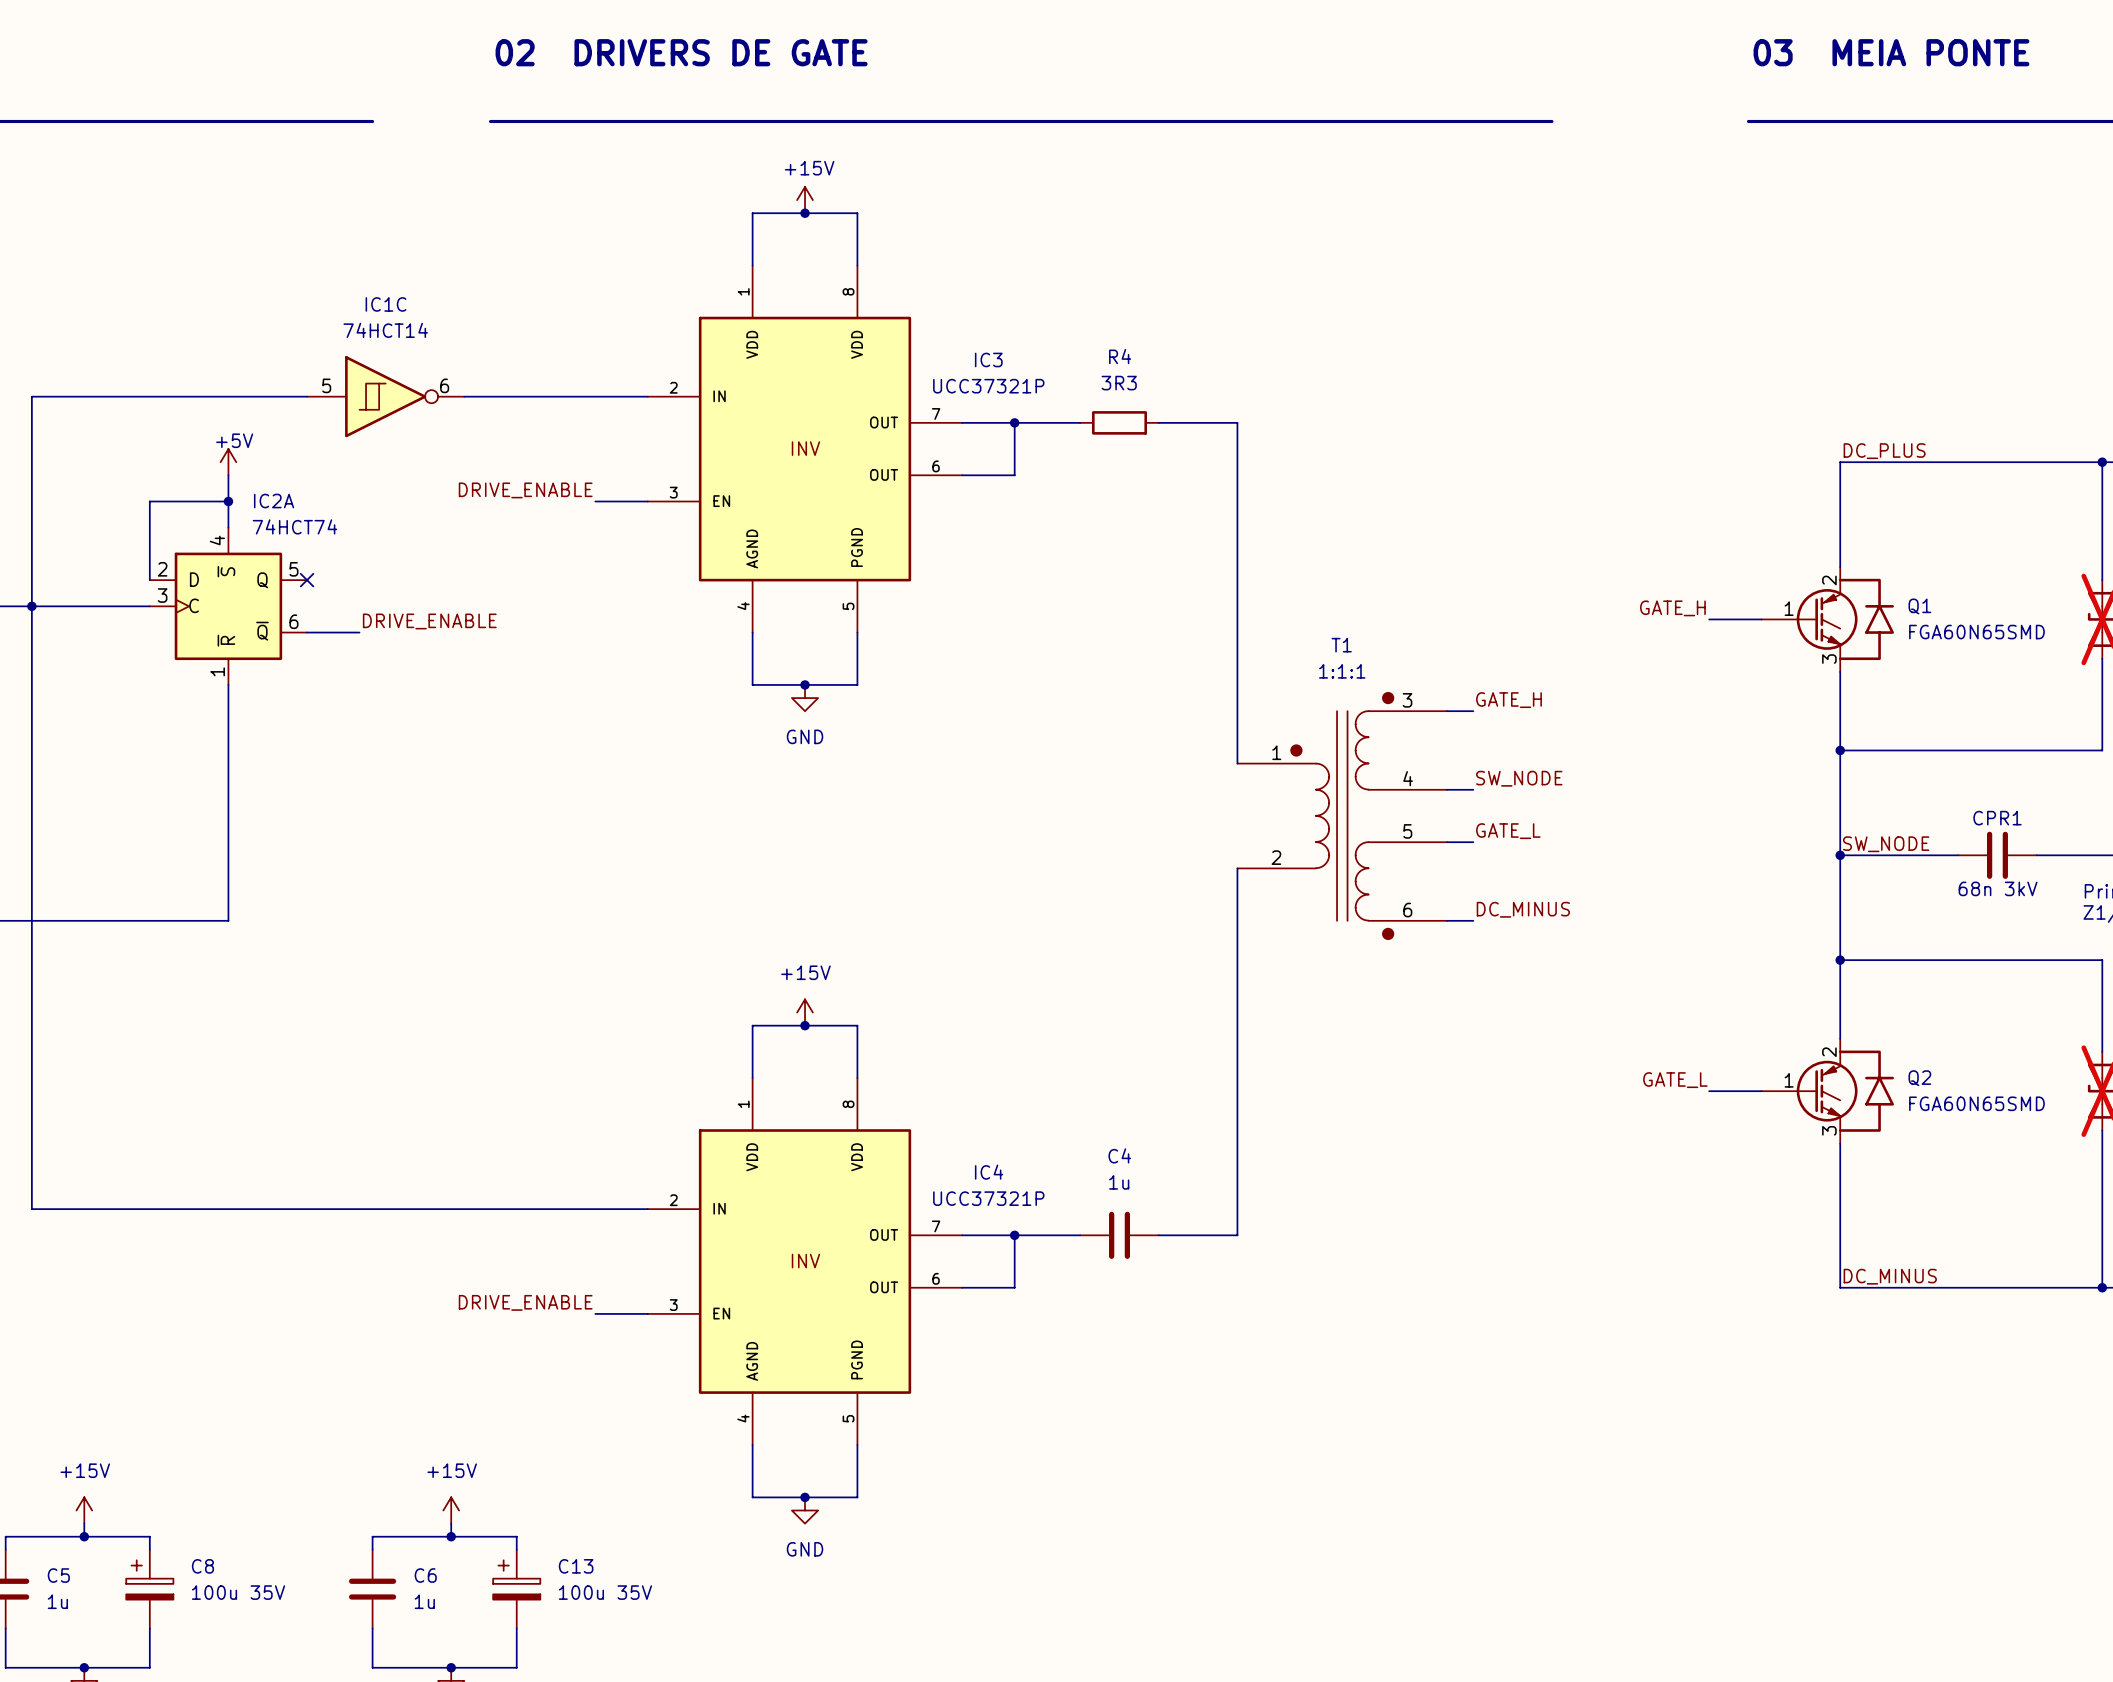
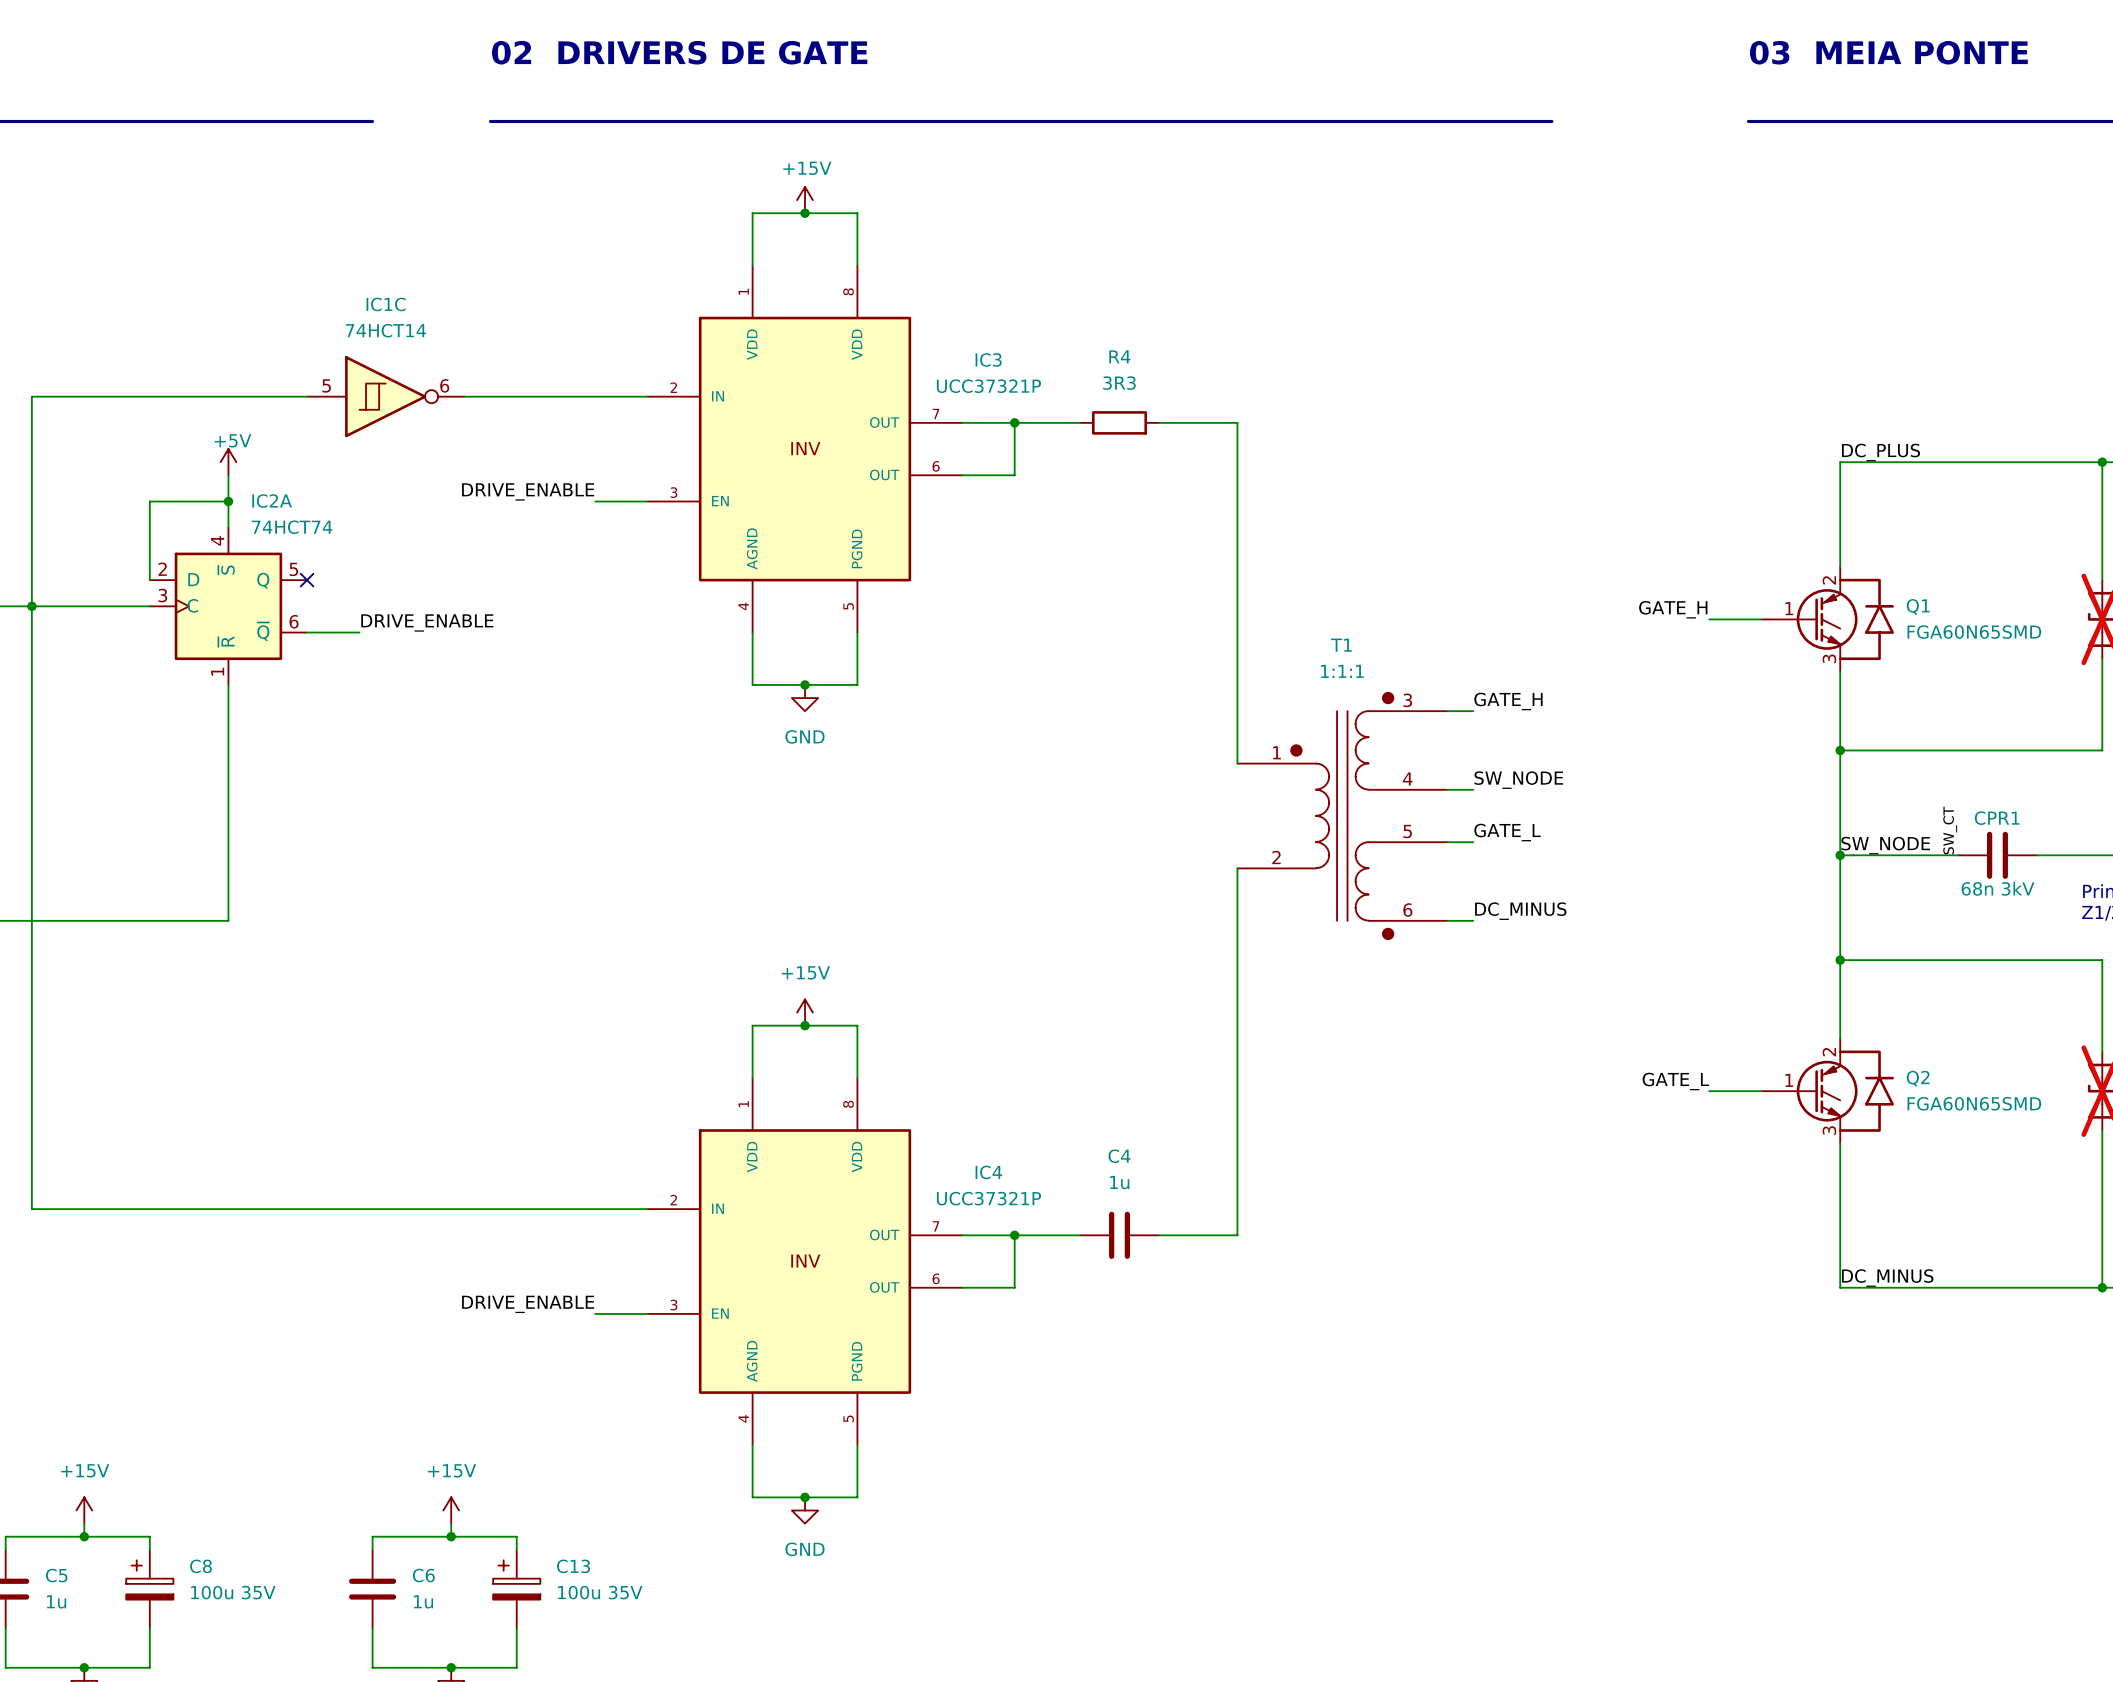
label: none -> SW_CT (1950, 830)

